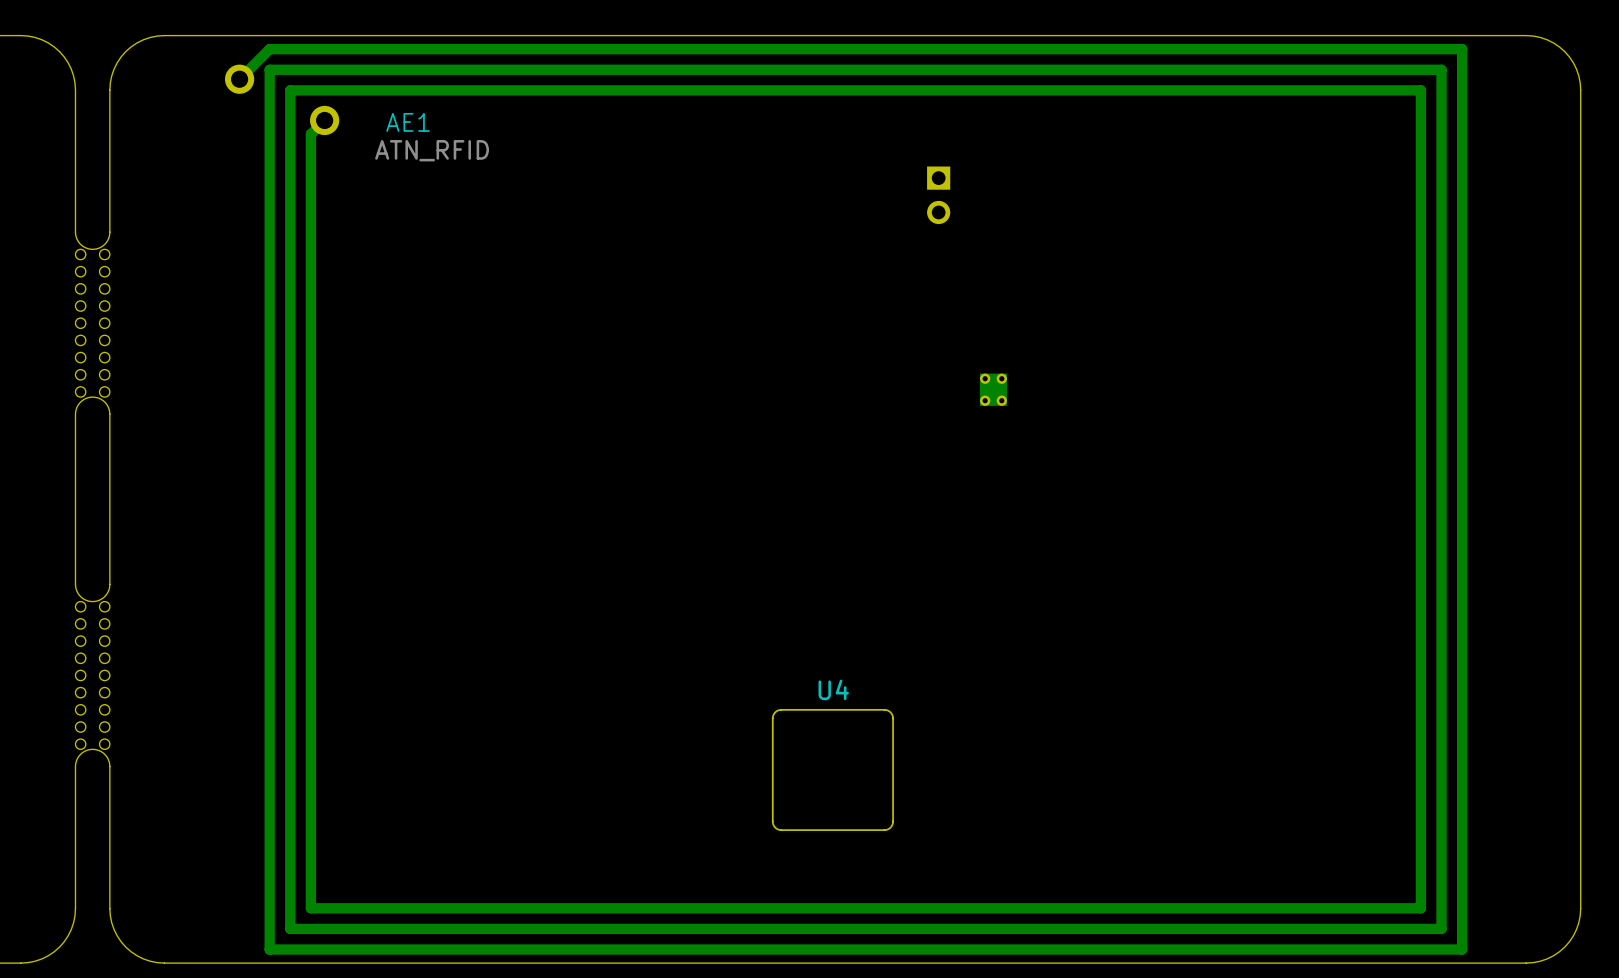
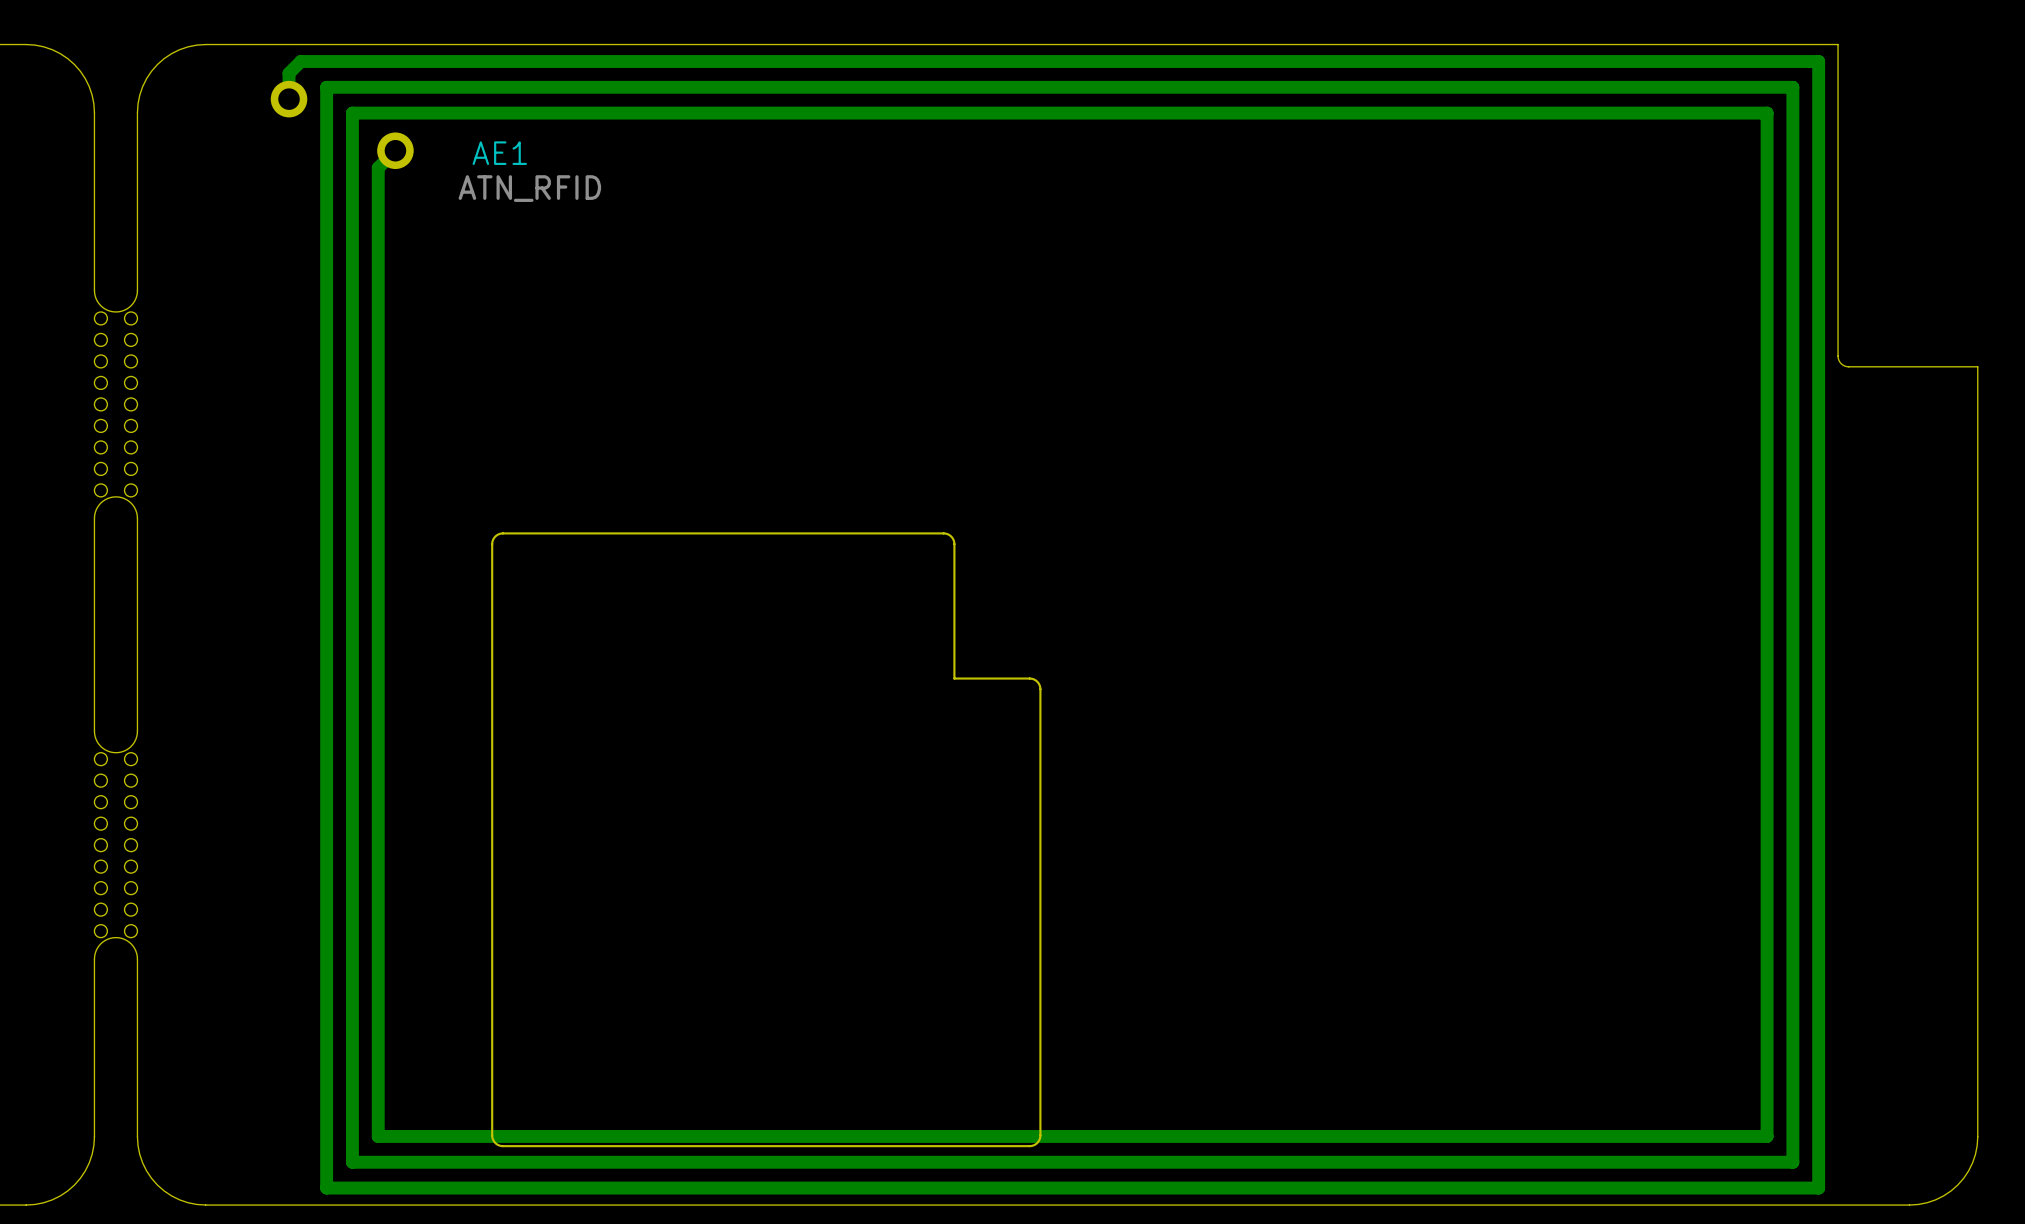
board edge: (1469, 35) (1540, 37) (1559, 46) (1569, 56) (1576, 69) (1580, 90) (1580, 293) -> (1838, 44) (1838, 360) (1842, 364) (1848, 366) (1977, 366)
AE1 footprint: [224, 44, 1468, 955] -> [270, 55, 1826, 1195]
part: (938, 195) -> none
part: (993, 389) -> none
board edge: none -> (943, 533) (502, 533) (494, 537) (492, 544) (492, 1135) (496, 1143) (502, 1146) (1029, 1146) (1038, 1141) (1040, 1135) (1040, 687) (1037, 681) (1031, 678) (954, 678) (954, 542) (951, 536) (943, 533)
text: U4 (833, 689) -> none
board edge: (884, 709) (781, 709) (775, 712) (772, 718) (772, 821) (775, 827) (781, 830) (884, 830) (890, 827) (893, 821) (893, 718) (890, 712) (884, 709) -> none

